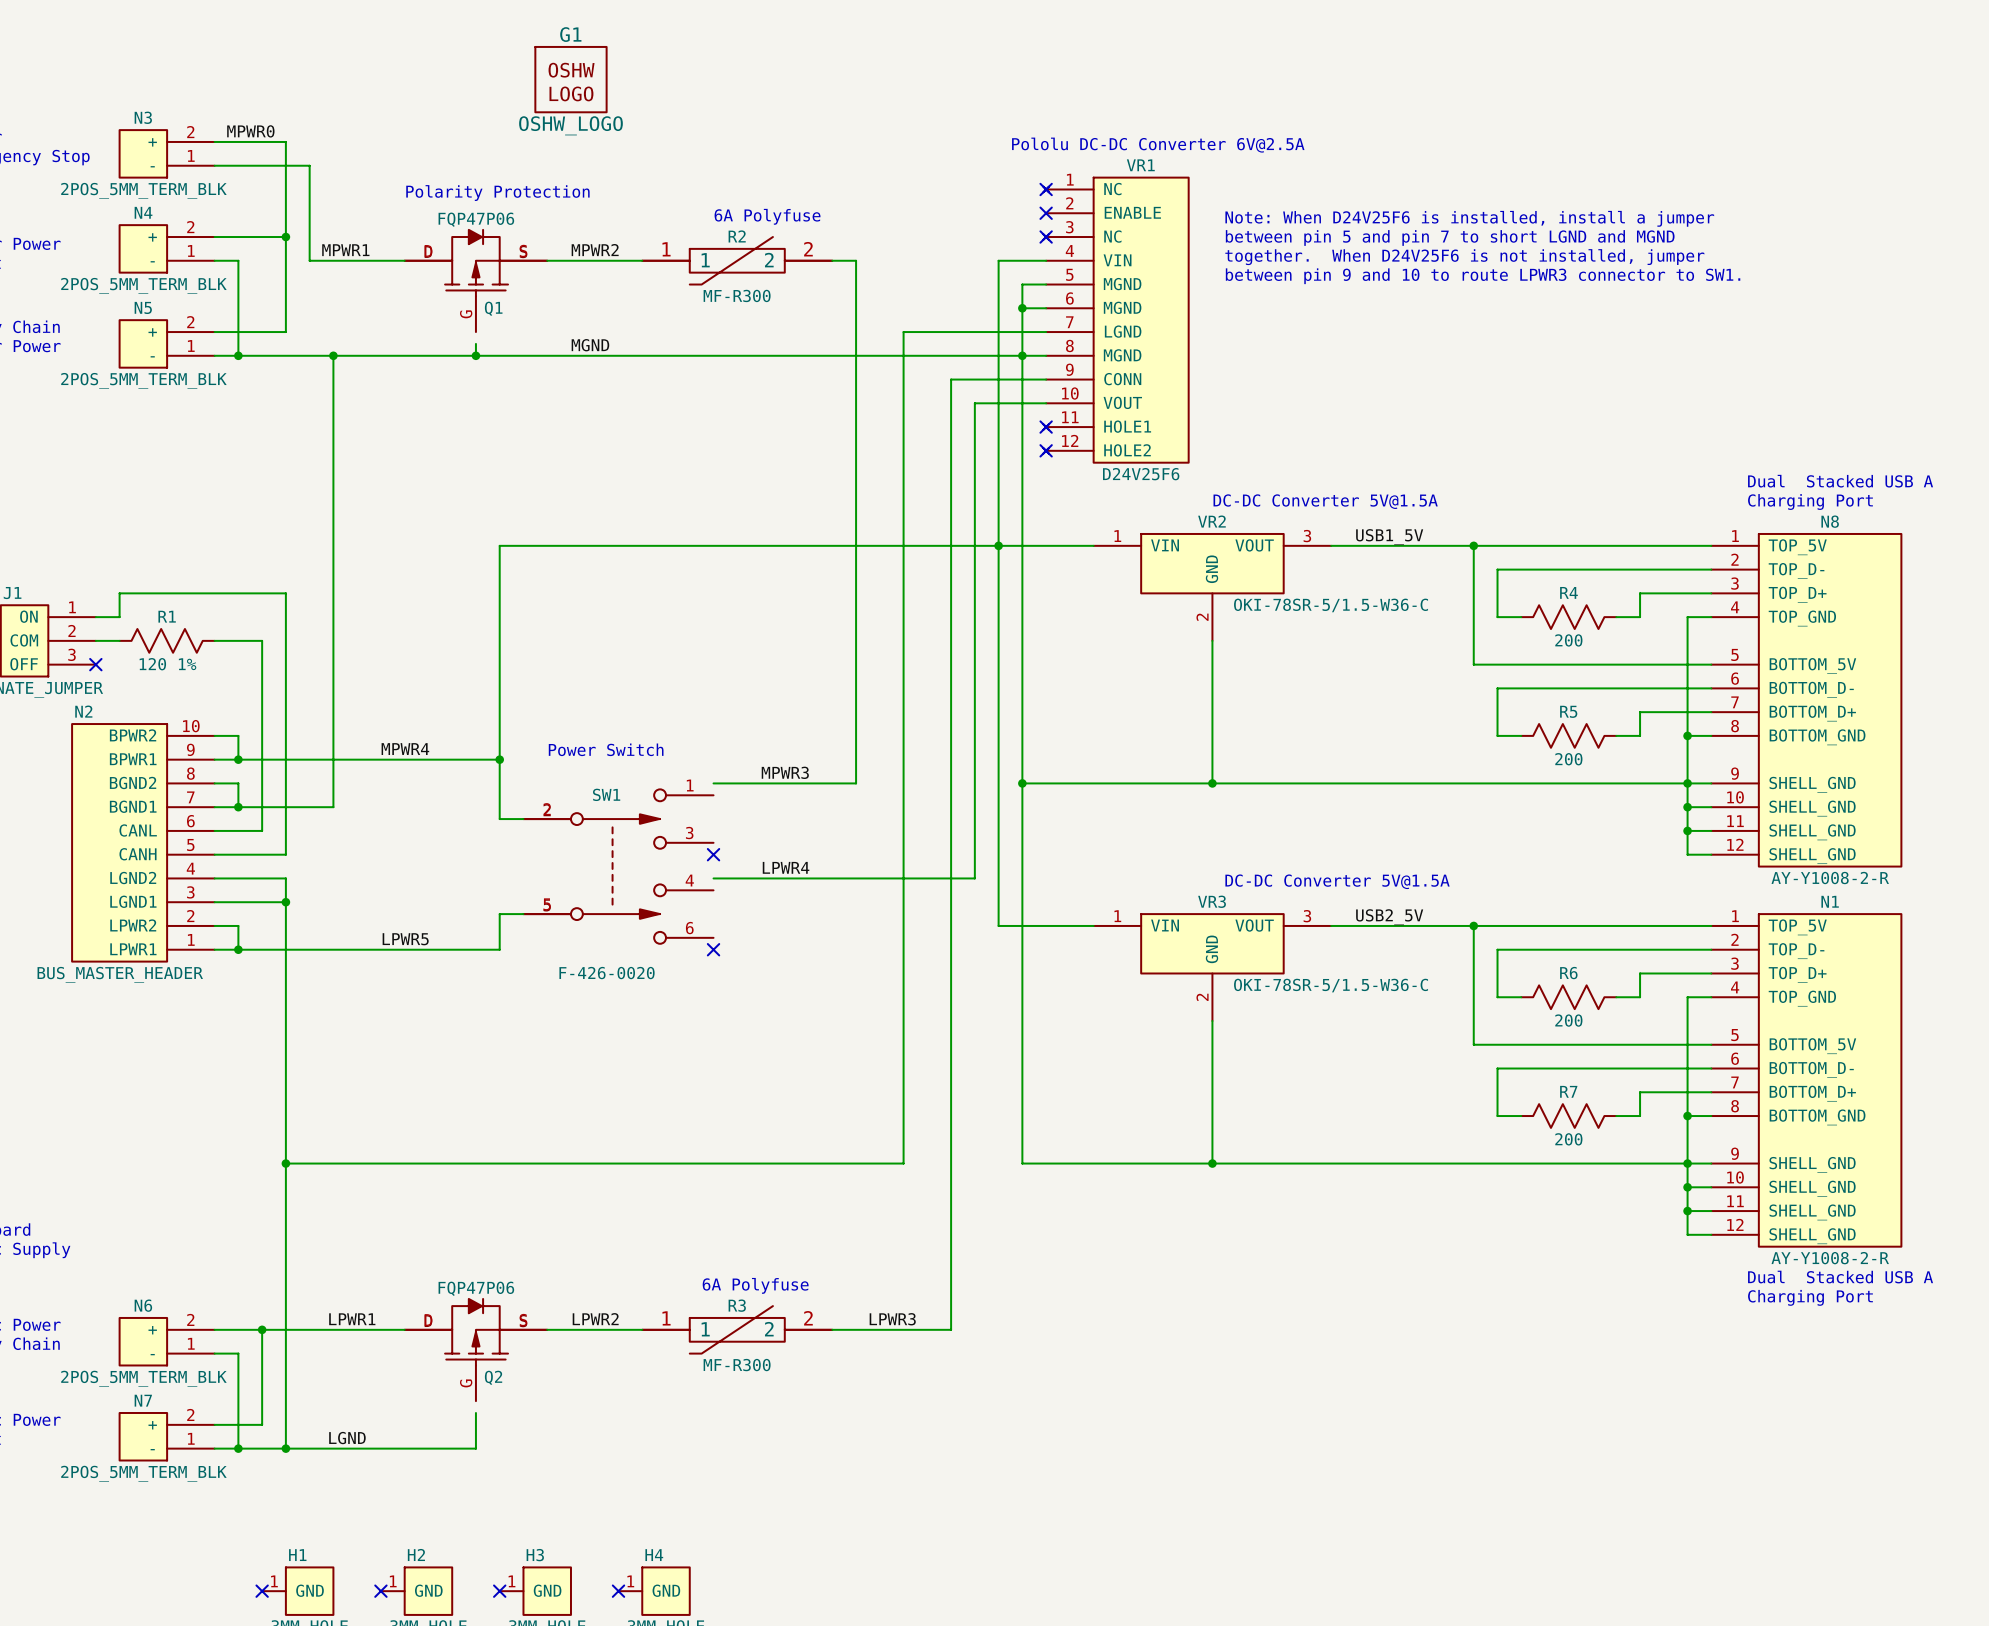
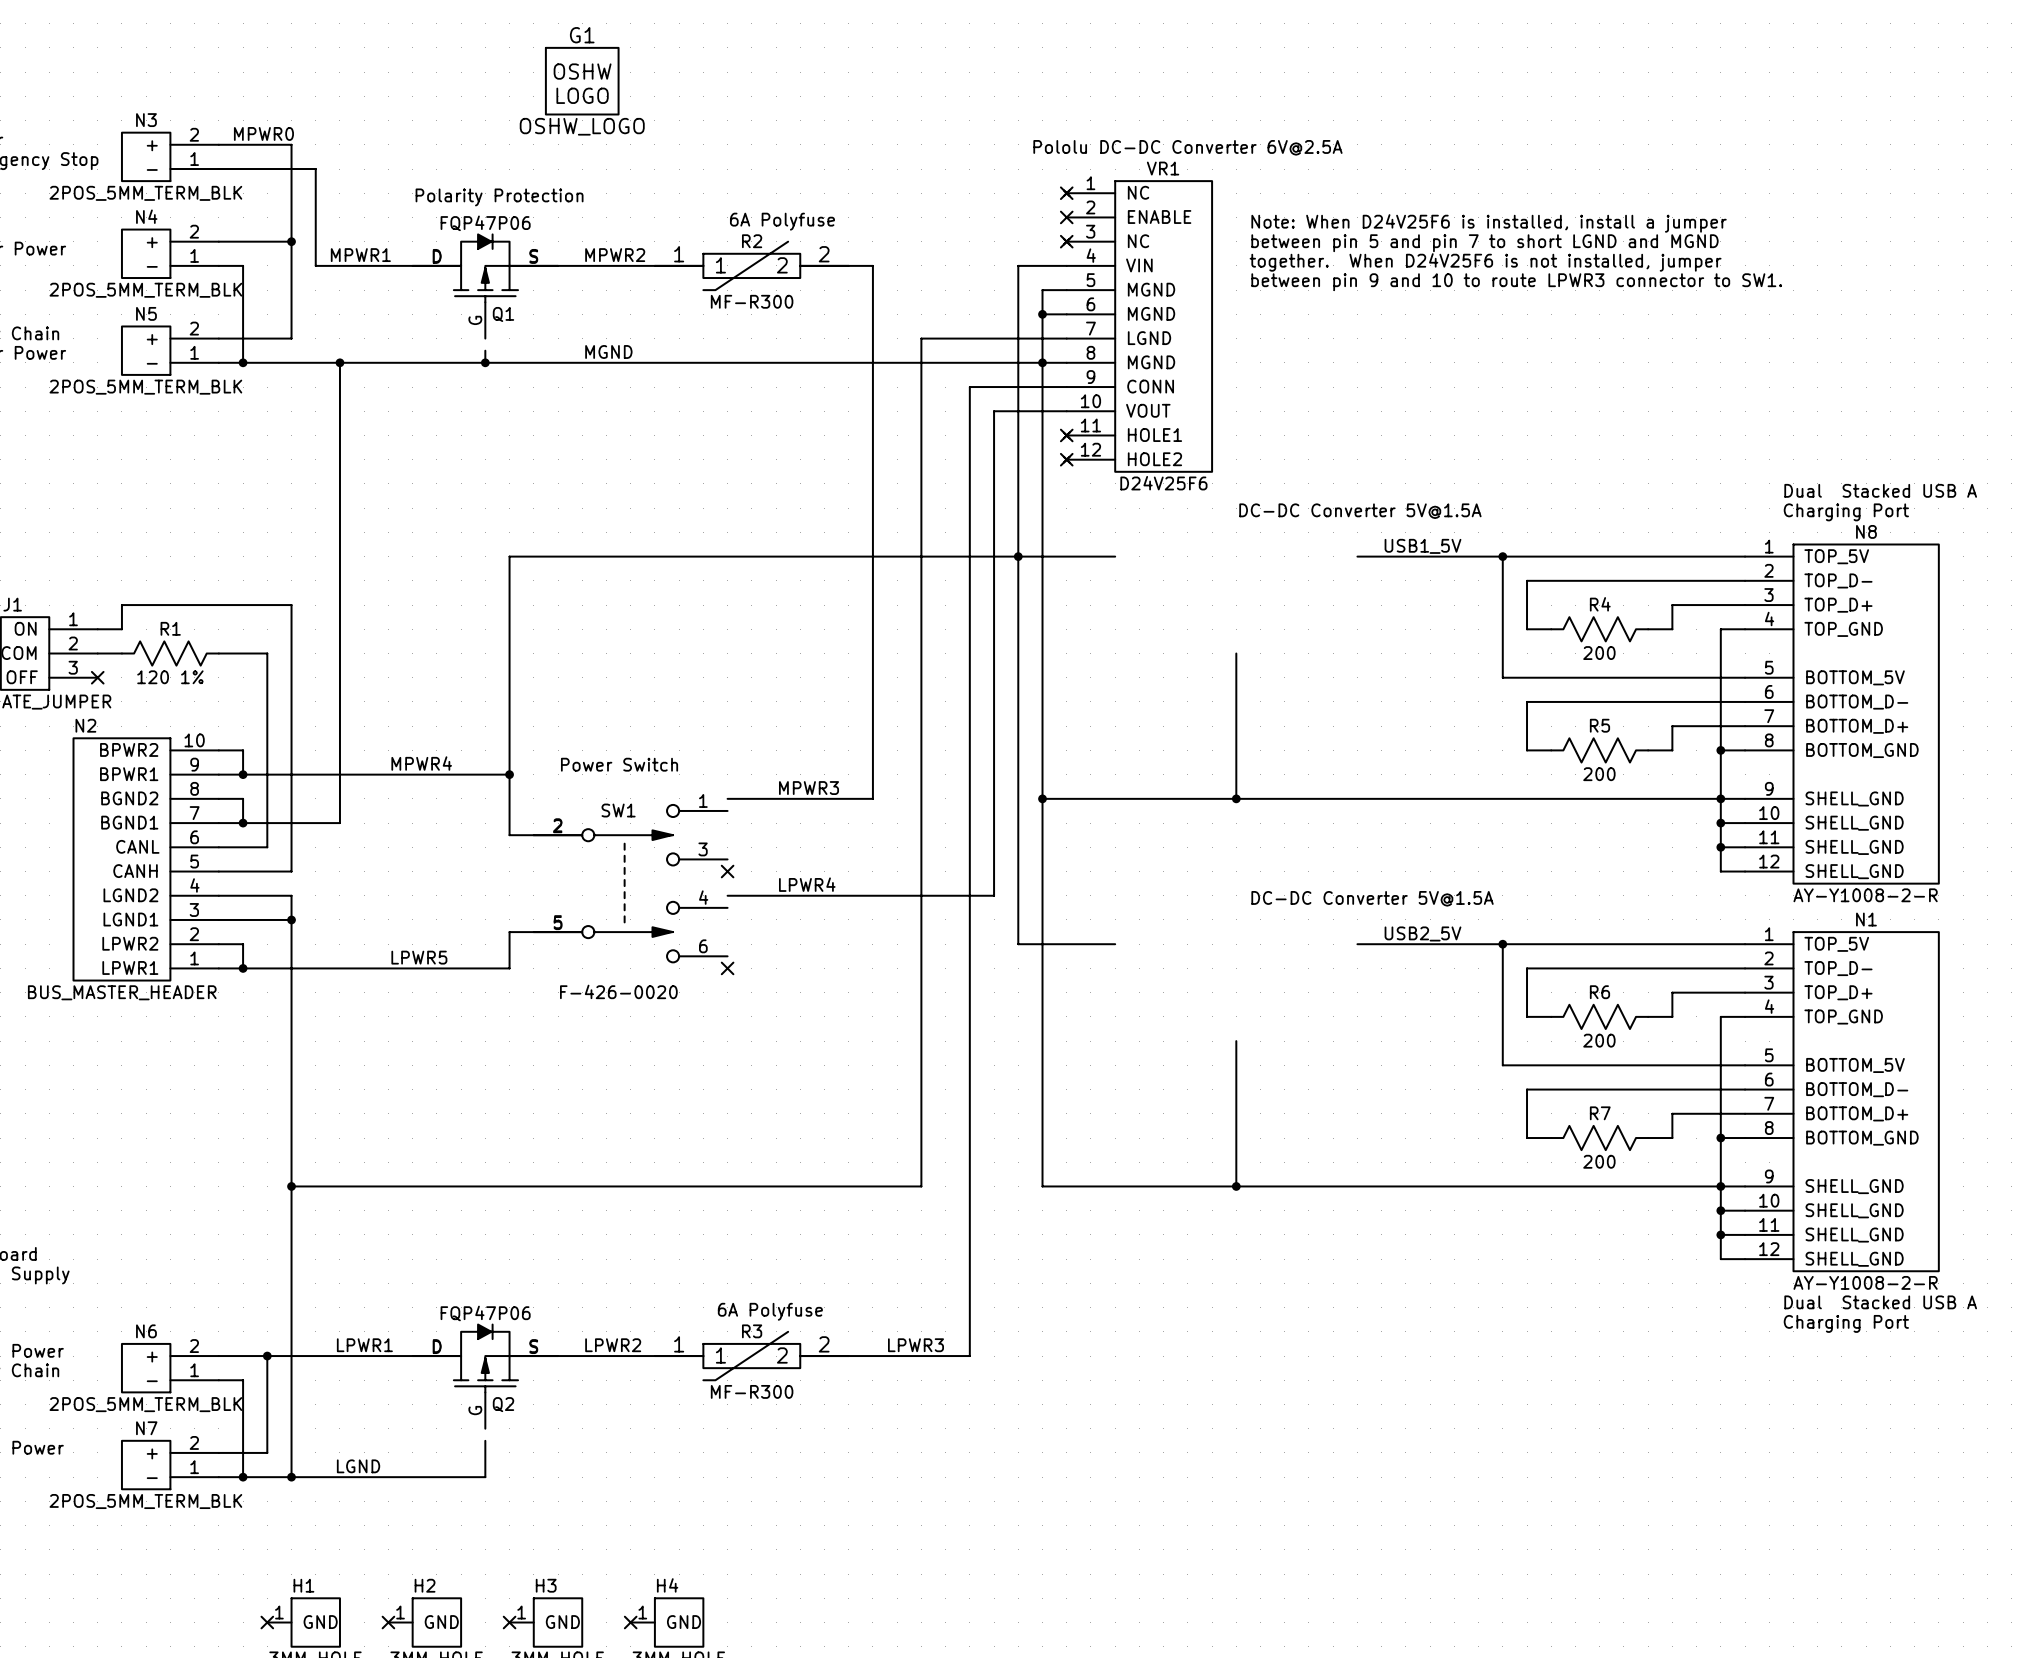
VR2: OKI-78SR-5/1.5-W36-C (1212, 587) -> none
VR3: OKI-78SR-5/1.5-W36-C (1212, 967) -> none

